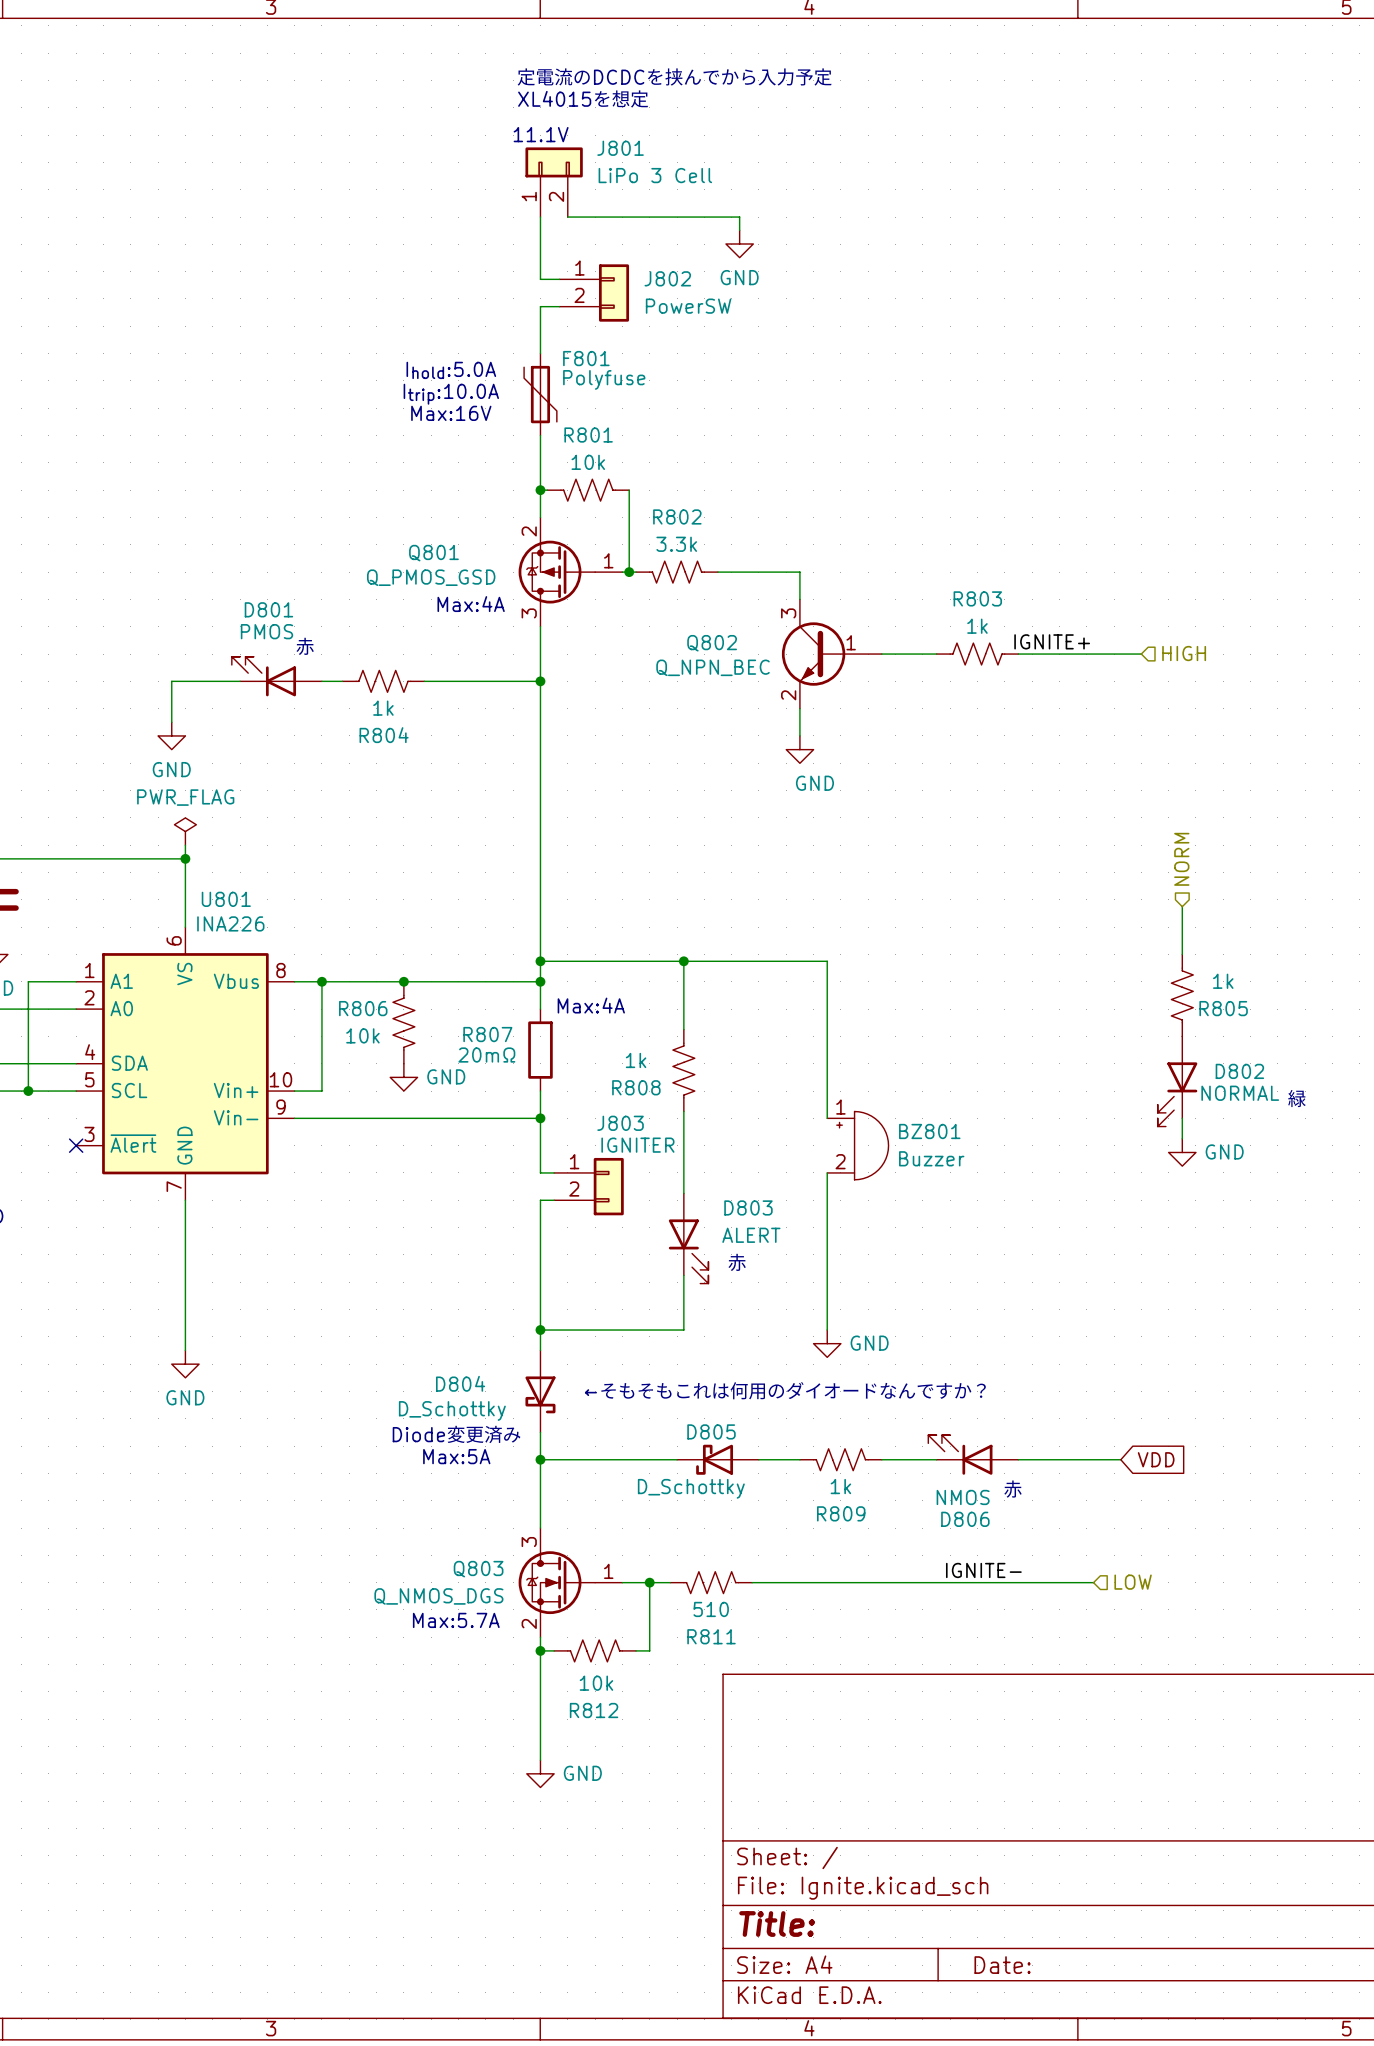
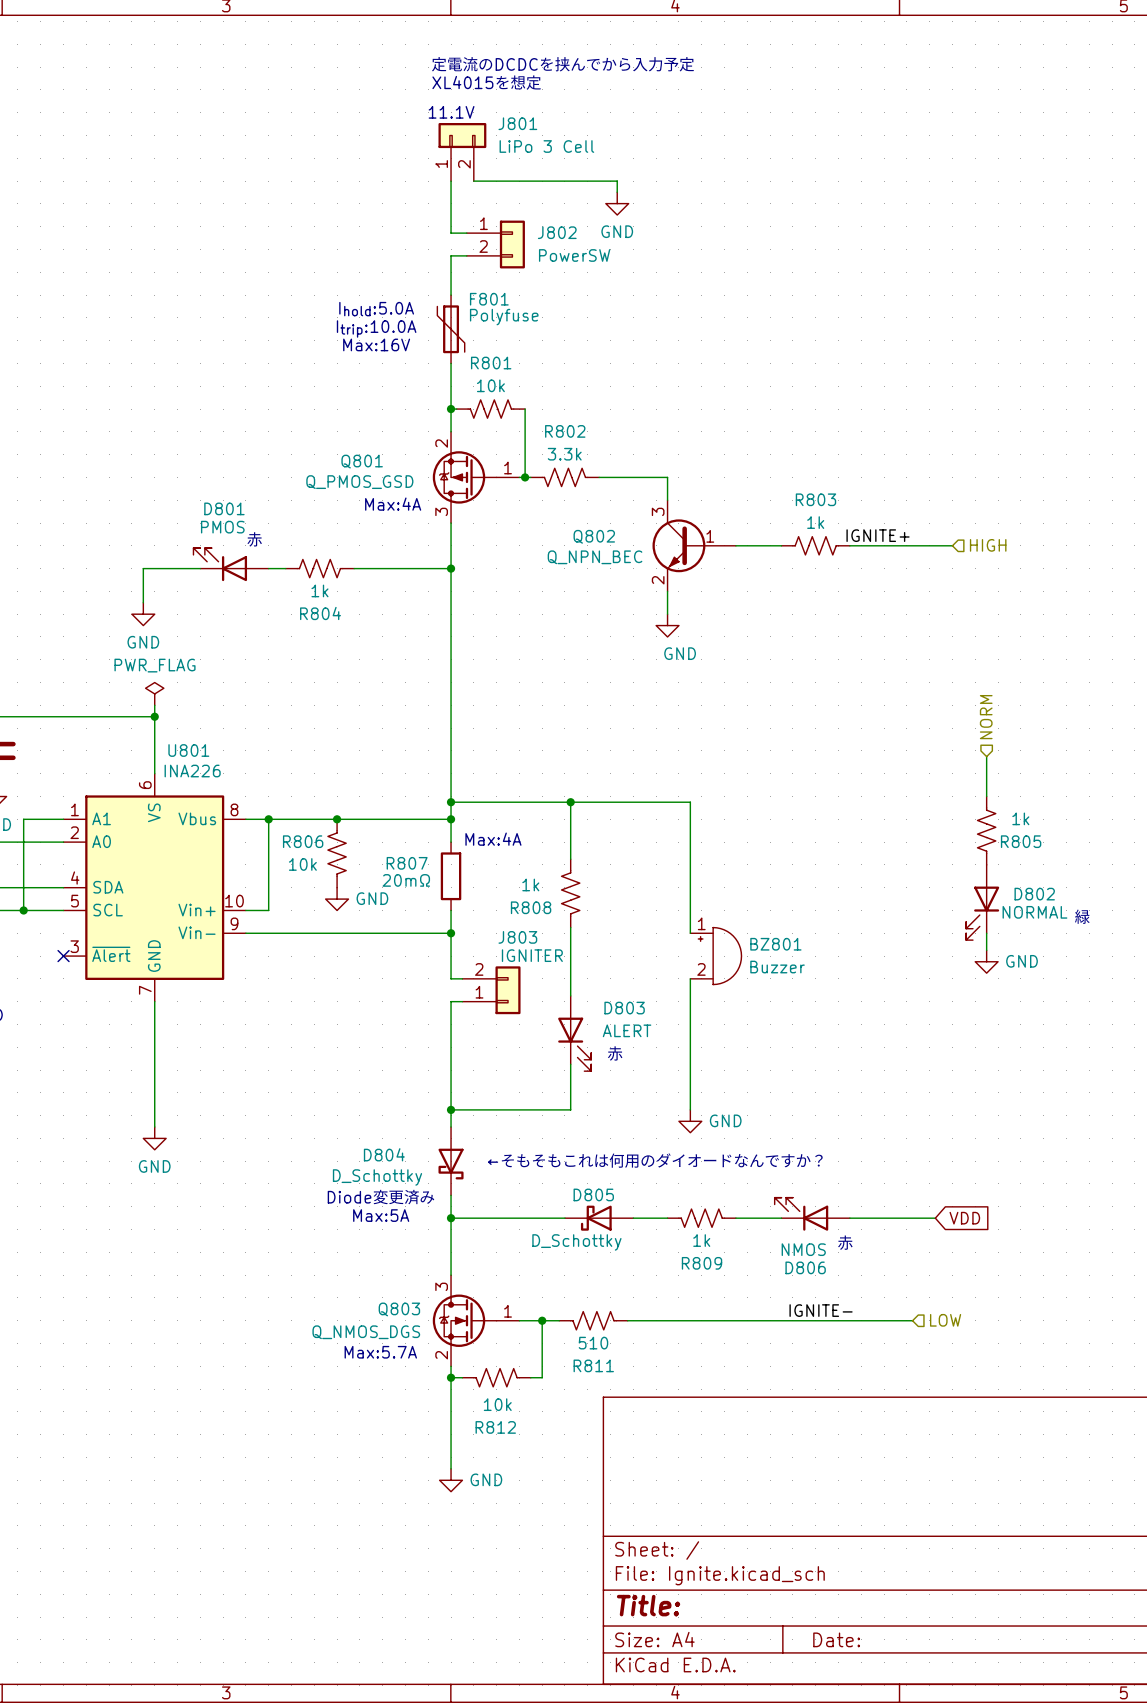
J803 flip: as is (608, 1186) -> up-down (508, 990)

